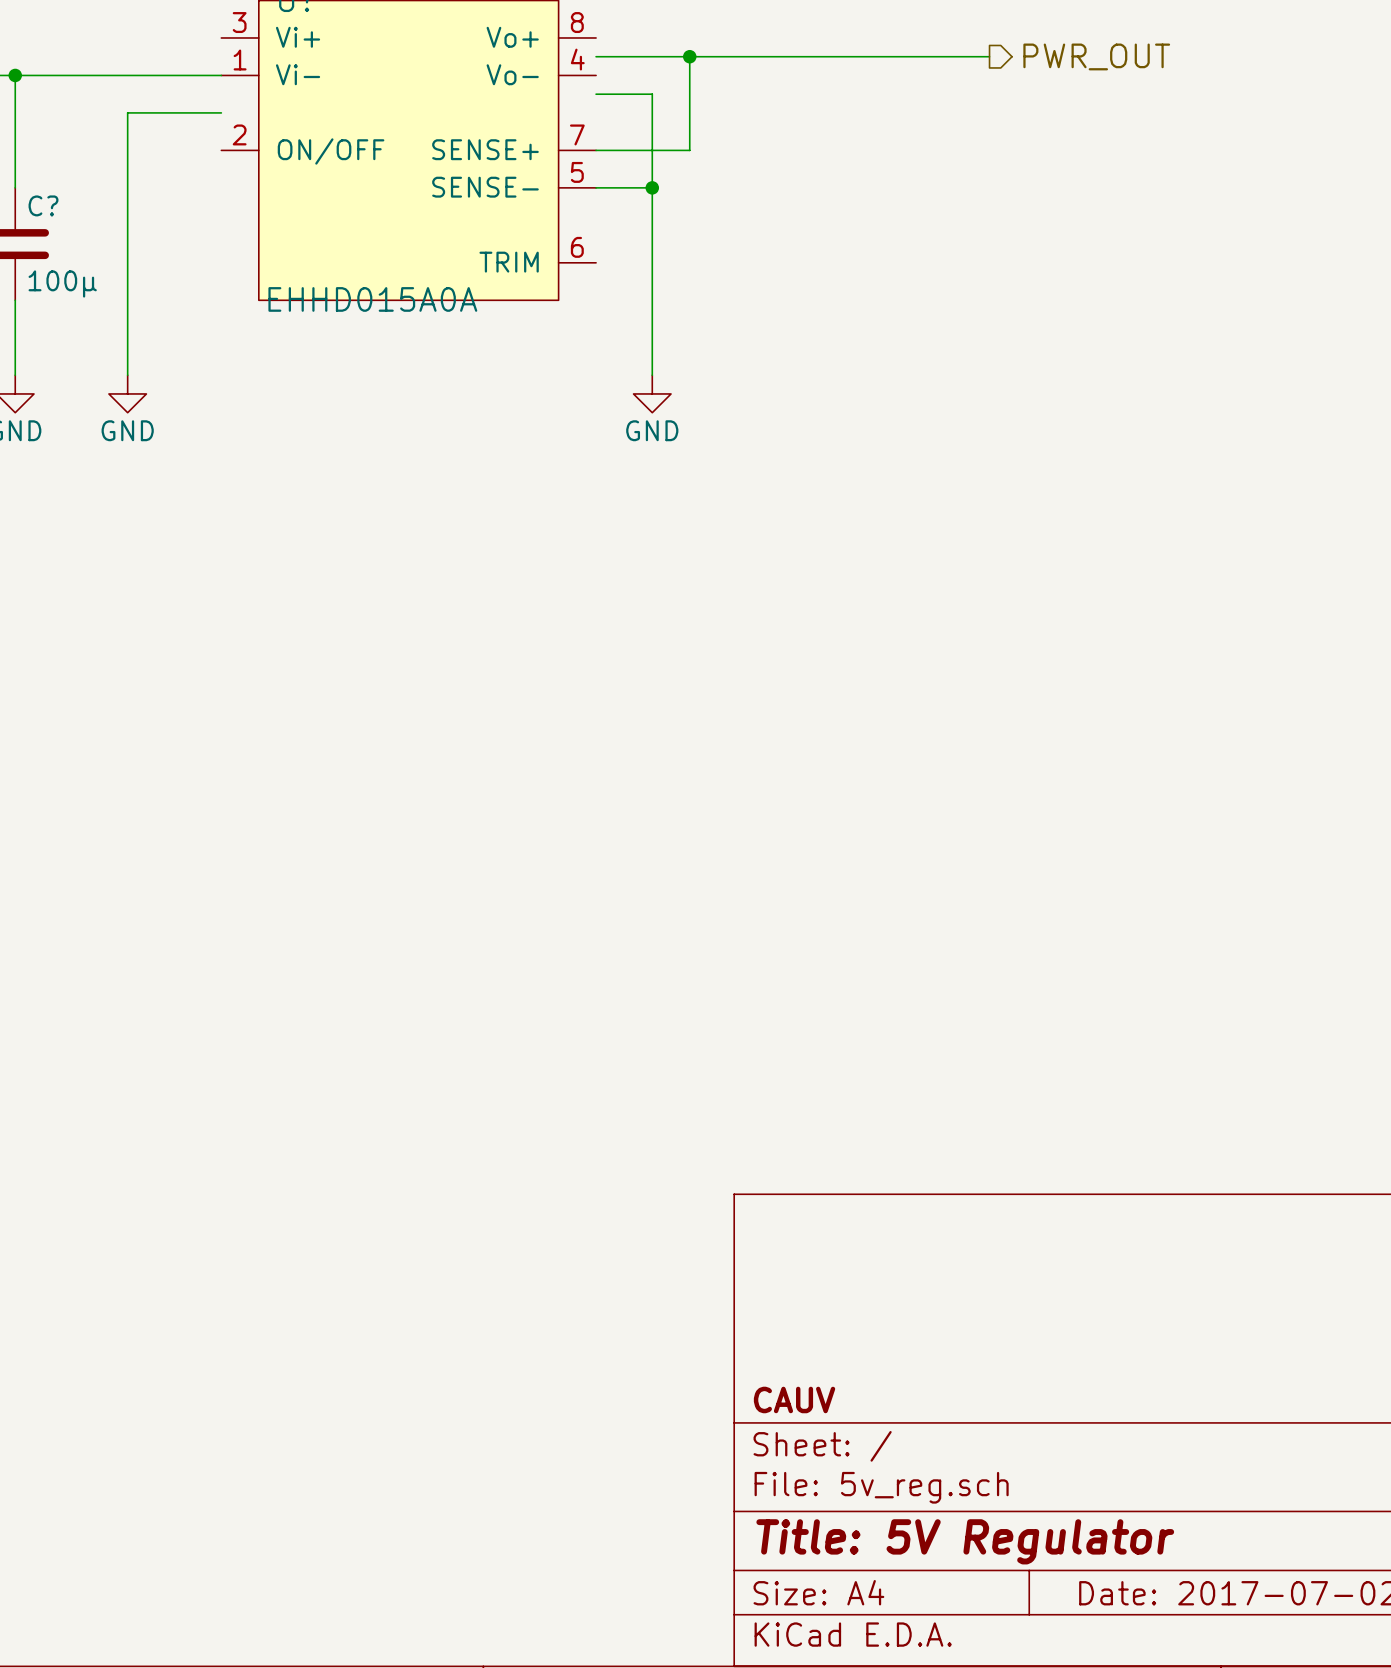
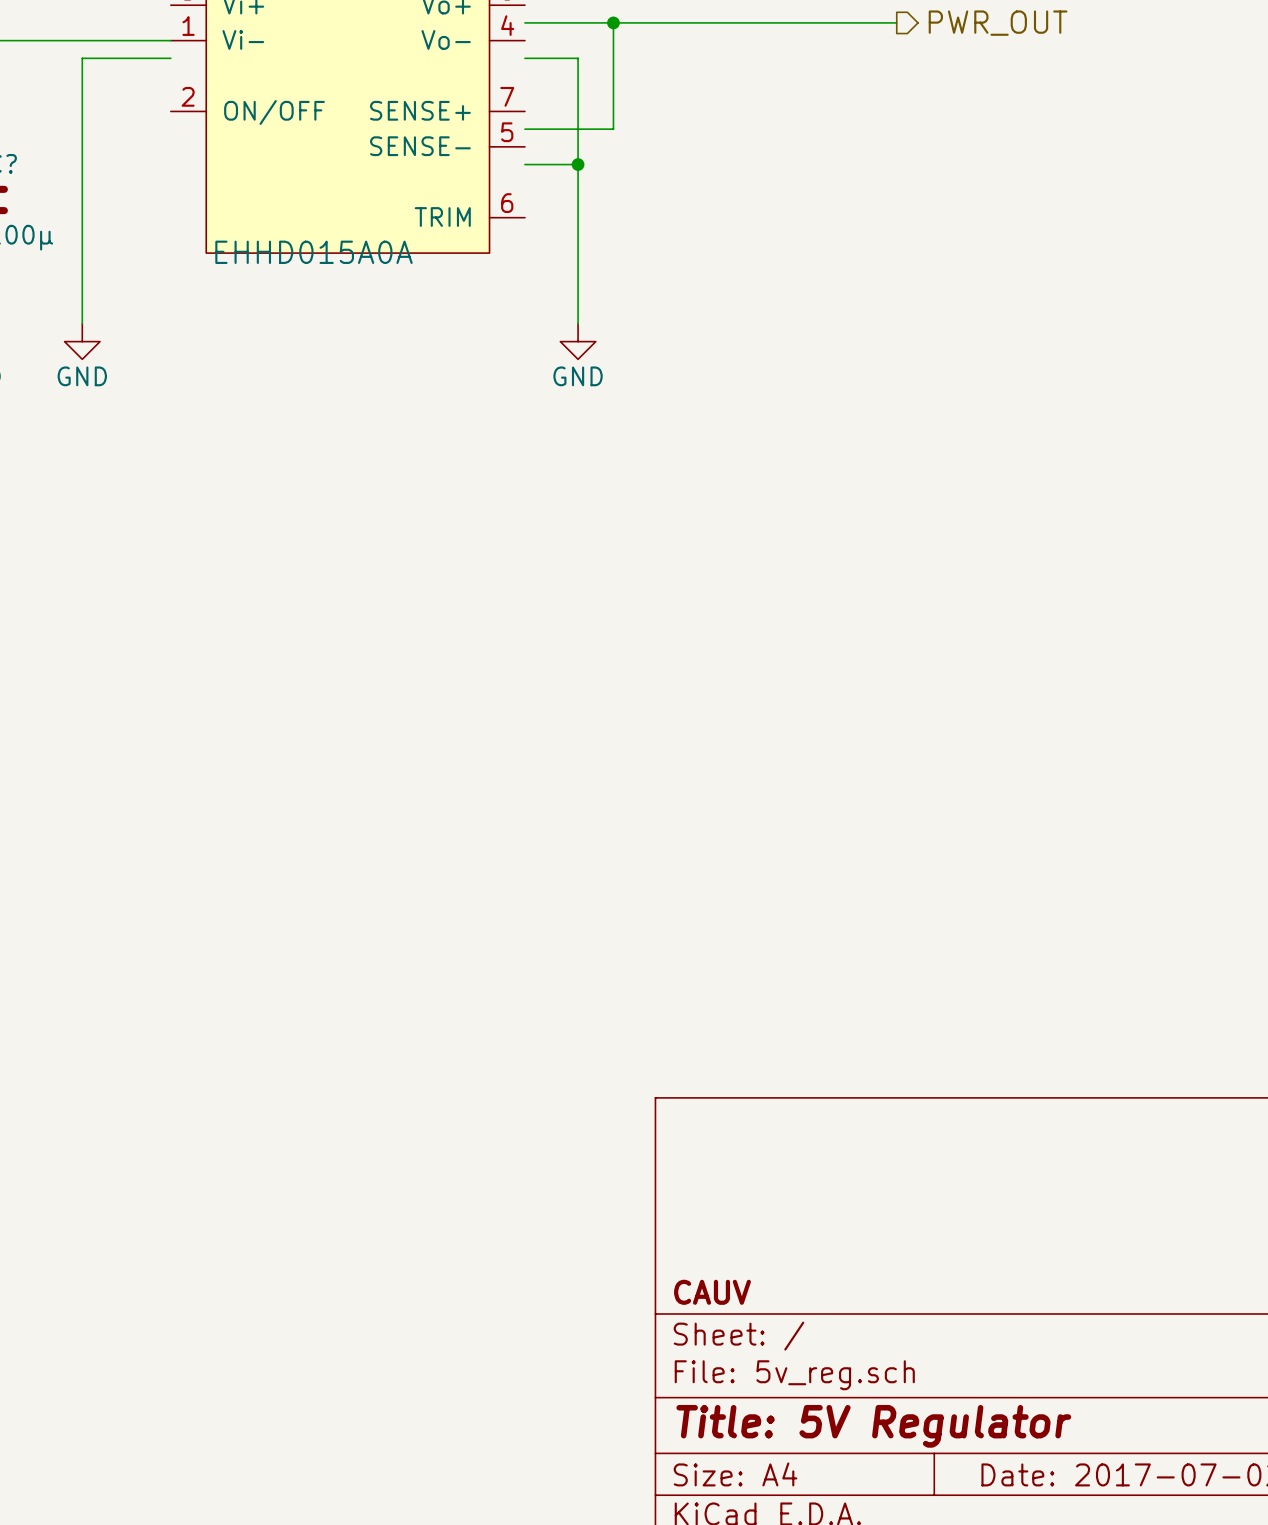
wire: (127, 112) (221, 112) -> (82, 76) (82, 58) (170, 58)
wire: (596, 150) (689, 150) -> (524, 129) (613, 129) (613, 111)
wire: (596, 187) (652, 187) -> (524, 164) (578, 164)
junction position: (652, 187) -> (578, 164)

